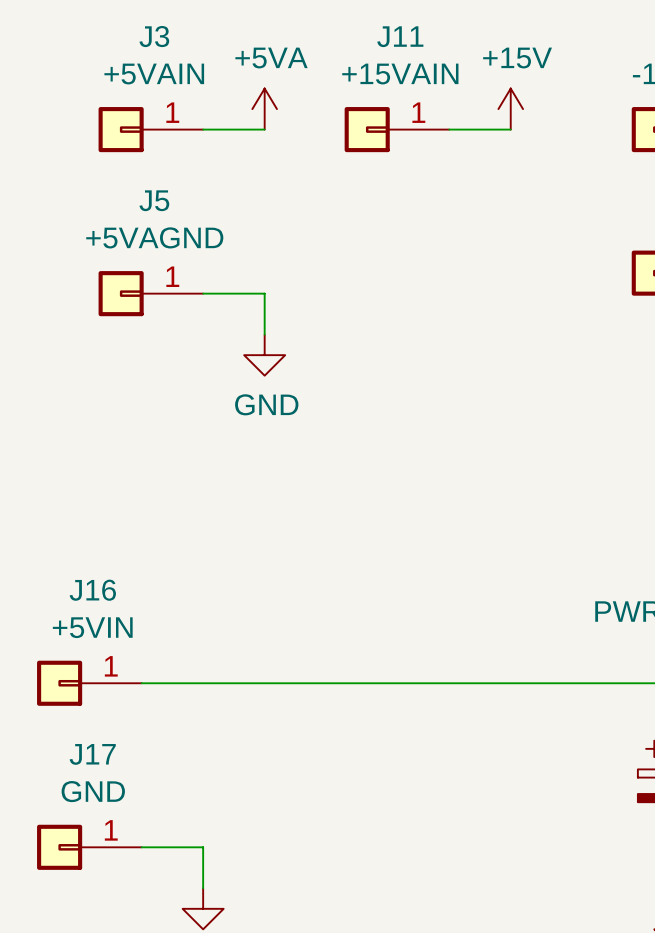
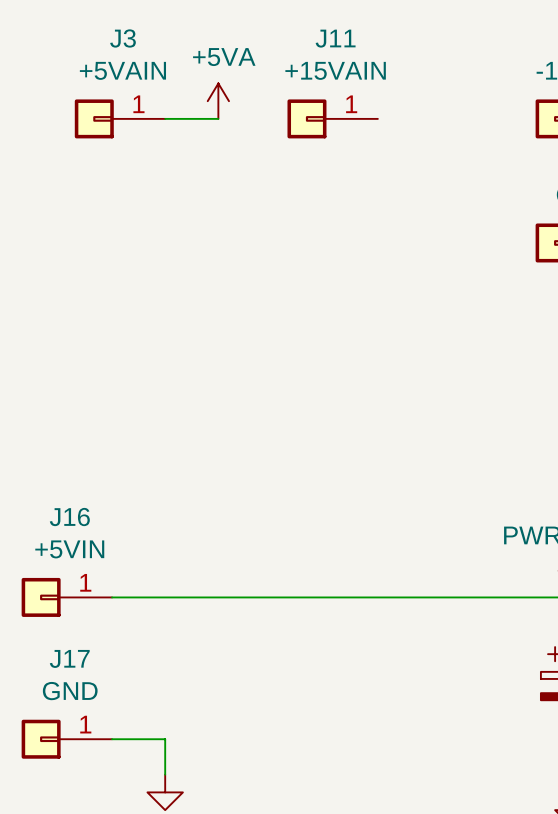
power symbol: +15V (510, 109) -> none
wire: (449, 129) (510, 129) -> none
J5: +5VAGND (150, 293) -> none
wire: (203, 293) (264, 293) (264, 334) -> none
power symbol: GND (264, 355) -> none

